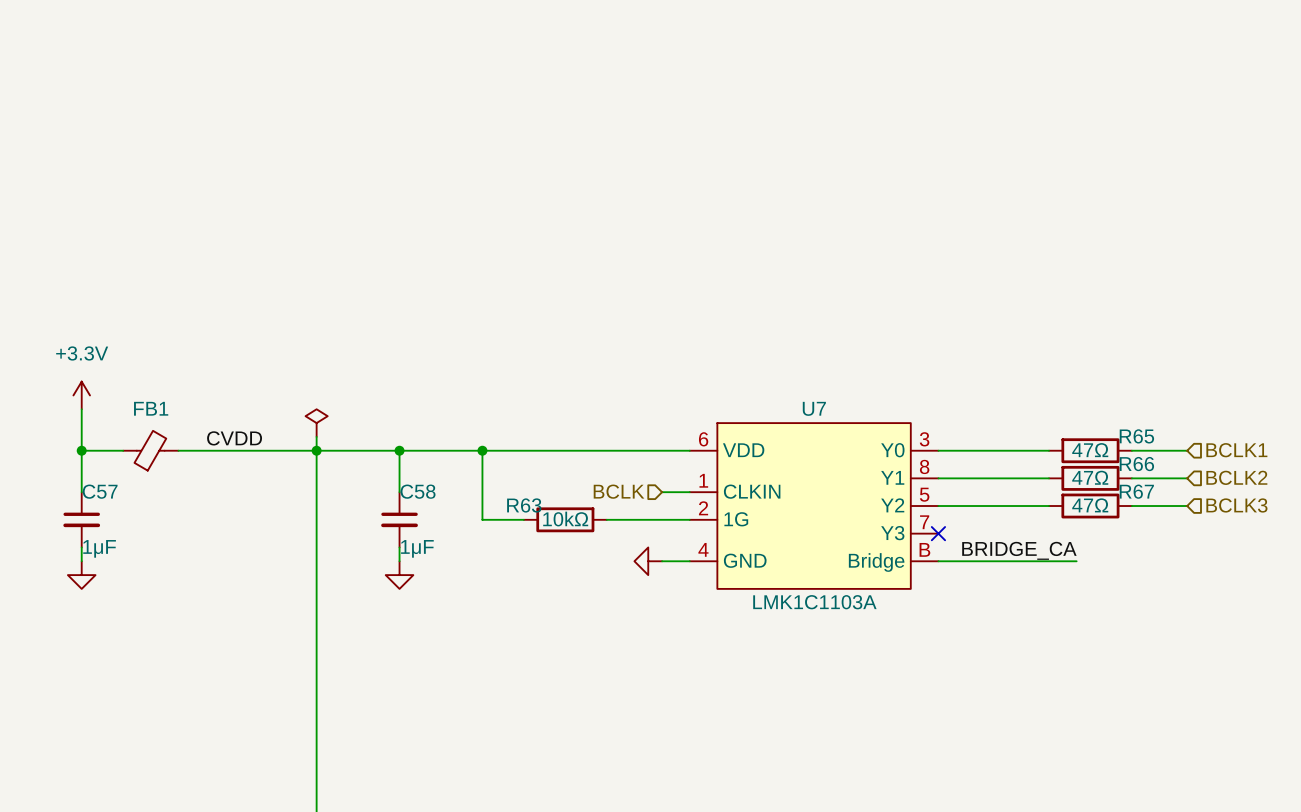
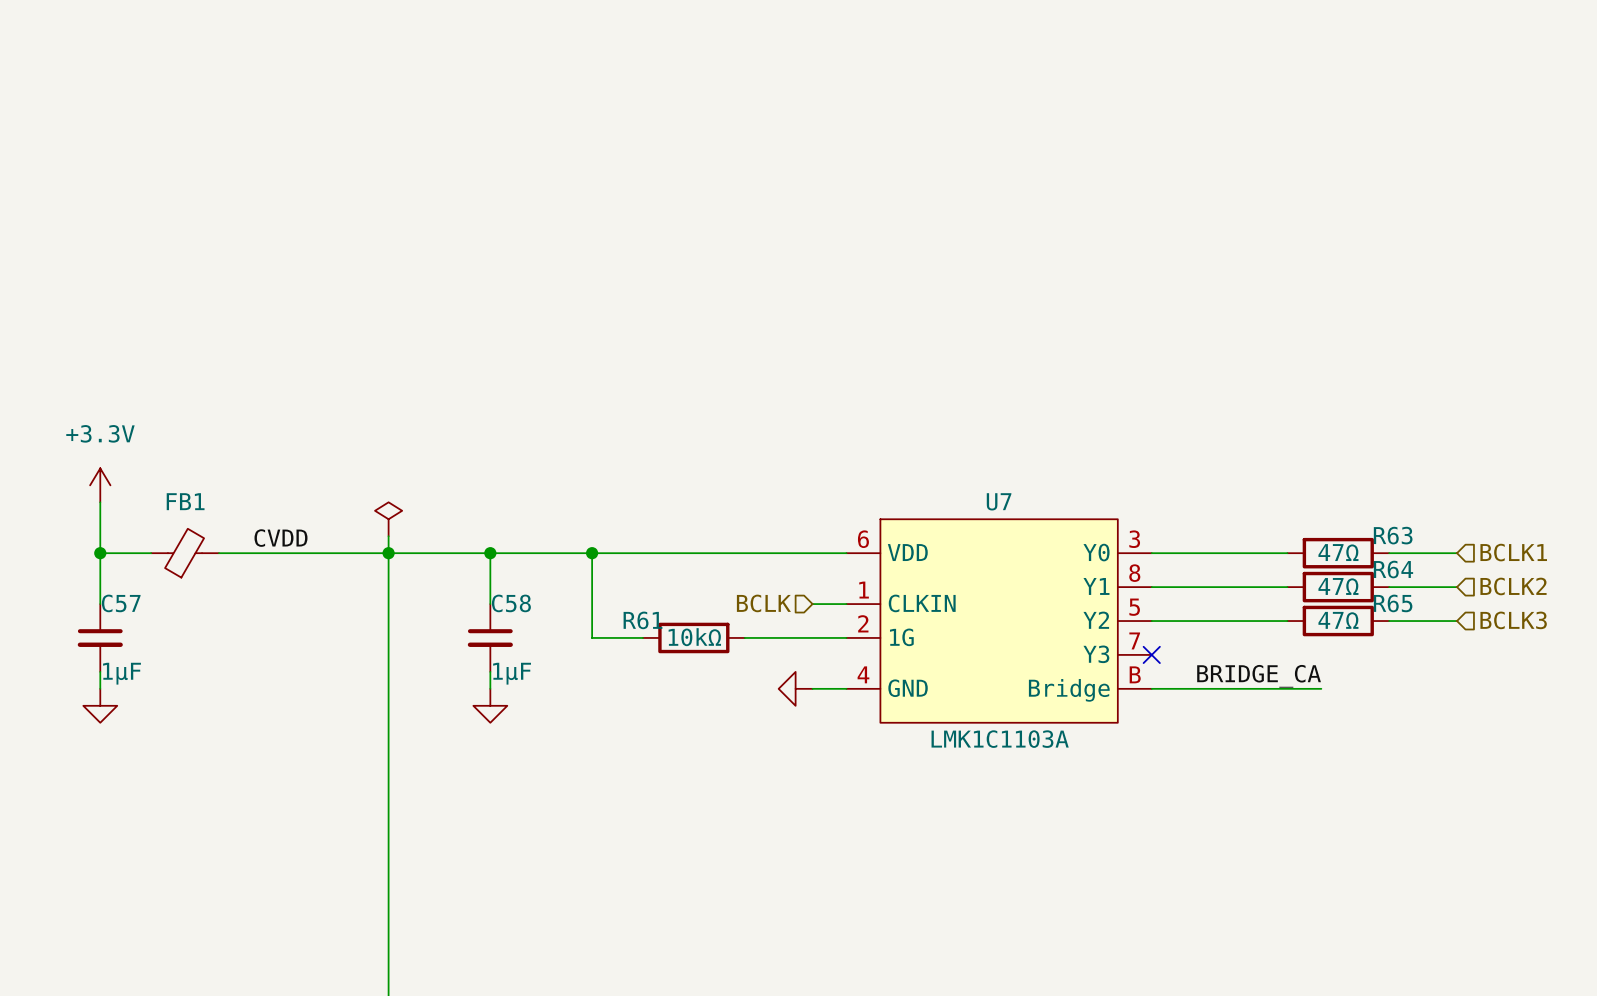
R65 name: R65 (1136, 436) -> R63 (1393, 535)
R66 name: R66 (1136, 464) -> R64 (1393, 569)
R67 name: R67 (1136, 491) -> R65 (1393, 603)
R63 name: R63 (524, 505) -> R61 (643, 620)

